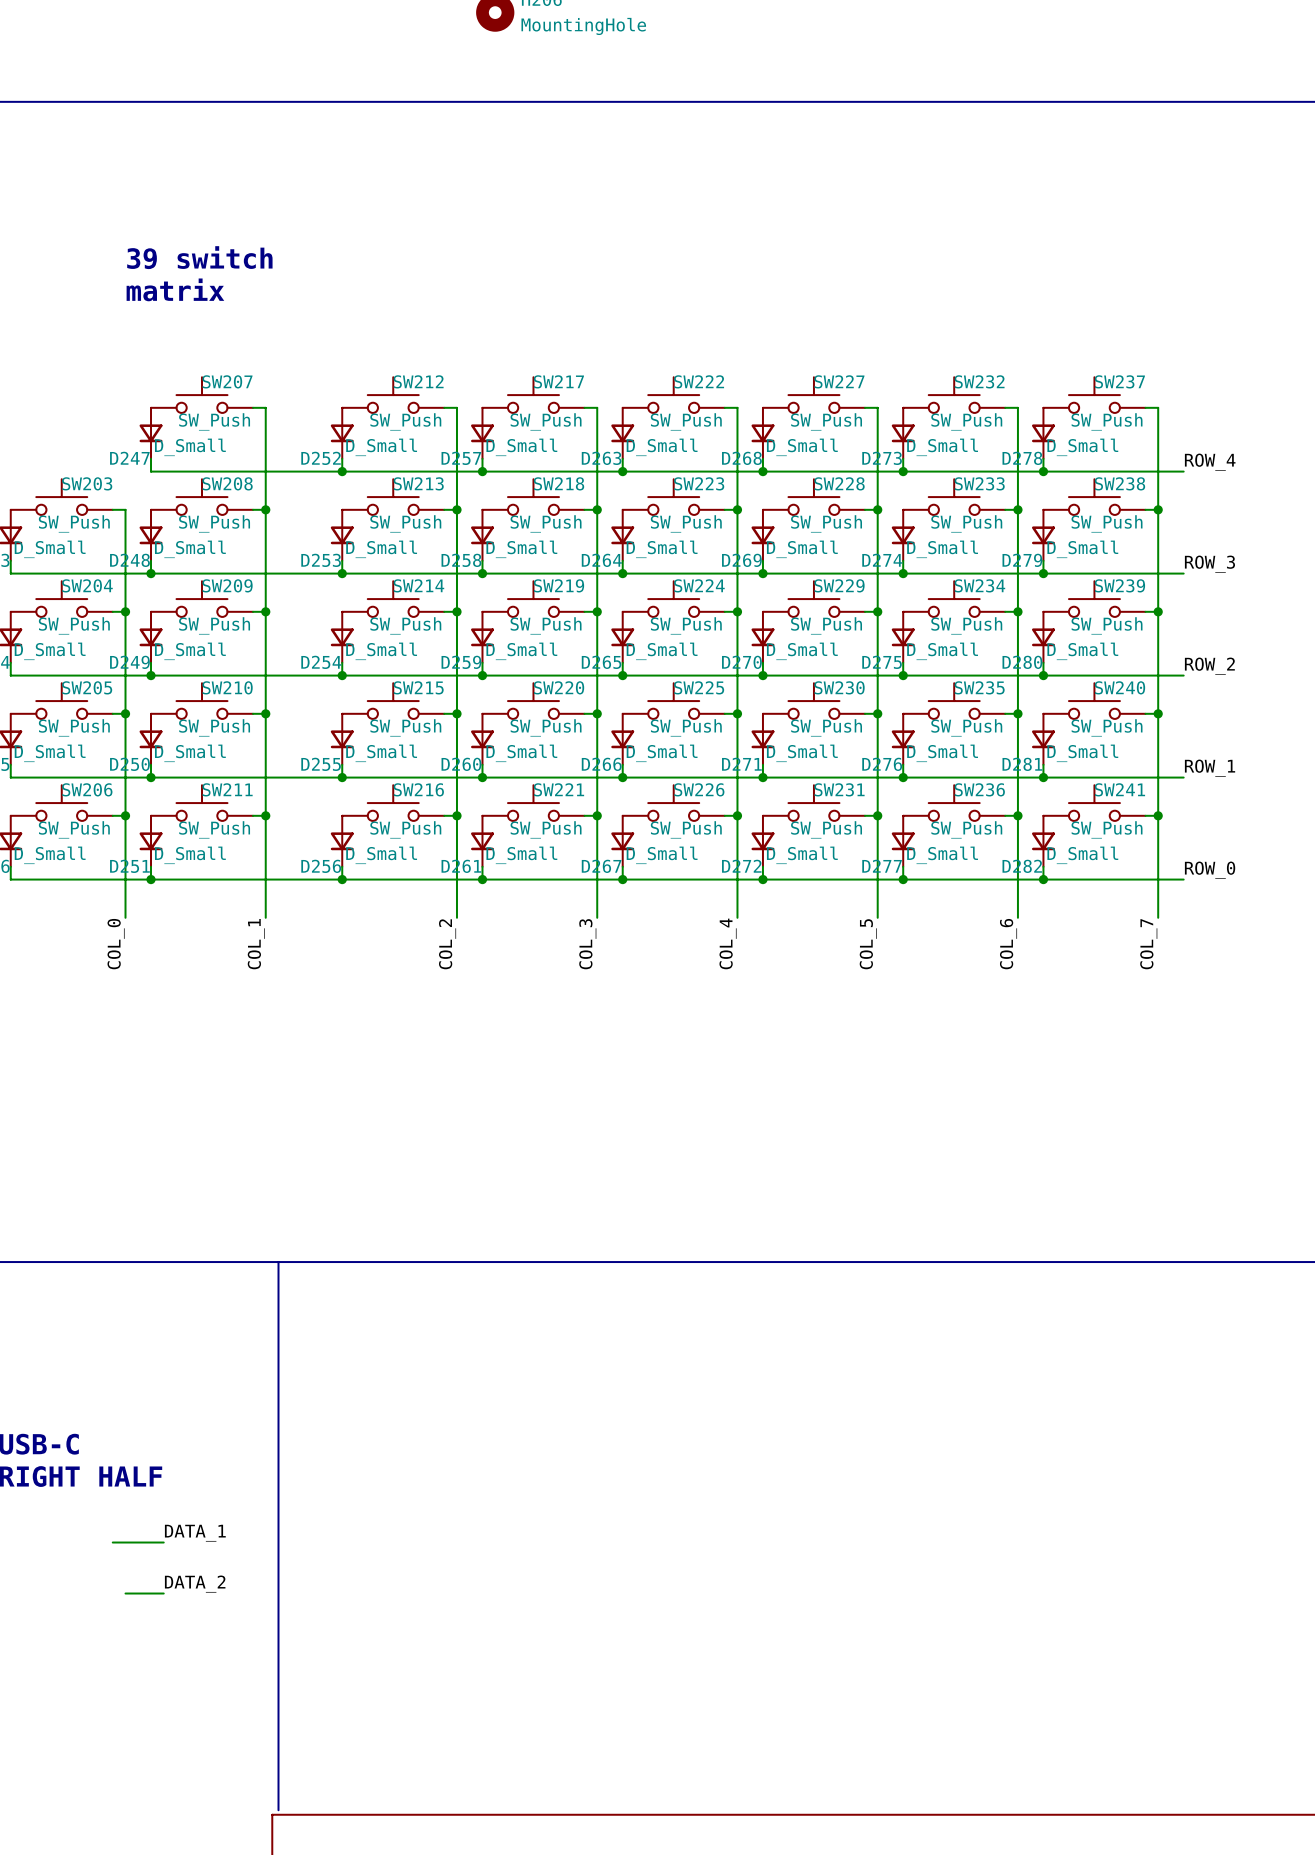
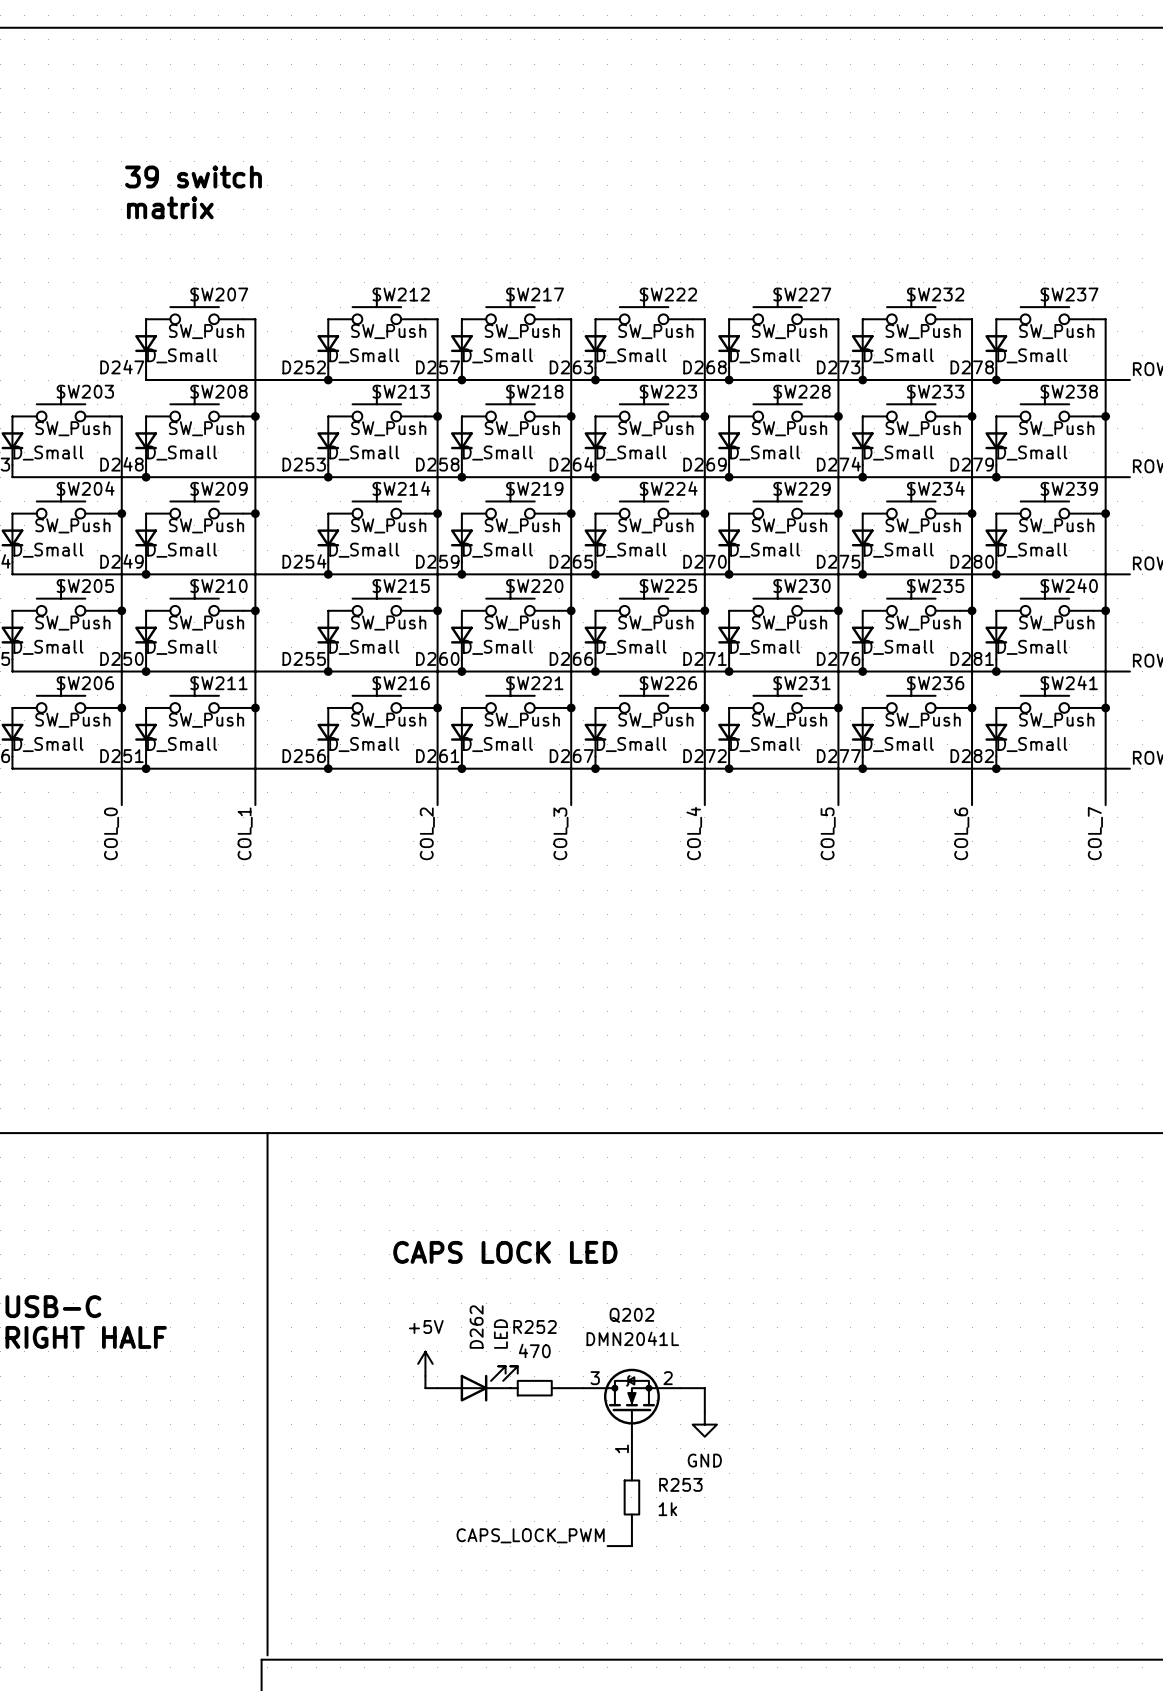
text: none -> CAPS LOCK LED (505, 1252)
power symbol: none -> +5V (425, 1363)
wire: none -> (425, 1376) (425, 1388) (437, 1388)
D262: none -> LED (477, 1383)
R252: none -> 470 (534, 1388)
wire: none -> (559, 1388) (583, 1388)
wire: none -> (680, 1388) (704, 1388) (704, 1412)
label: DATA_1 (195, 1533) -> none
wire: (112, 1542) (163, 1542) -> none
Q202: none -> DMN2041L (631, 1414)
power symbol: none -> GND (704, 1424)
label: DATA_2 (195, 1584) -> none
wire: (125, 1593) (163, 1593) -> none
wire: none -> (631, 1461) (631, 1473)
R253: none -> 1k (631, 1497)
wire: none -> (631, 1521) (631, 1546) (607, 1546)
label: none -> CAPS_LOCK_PWM (530, 1535)

